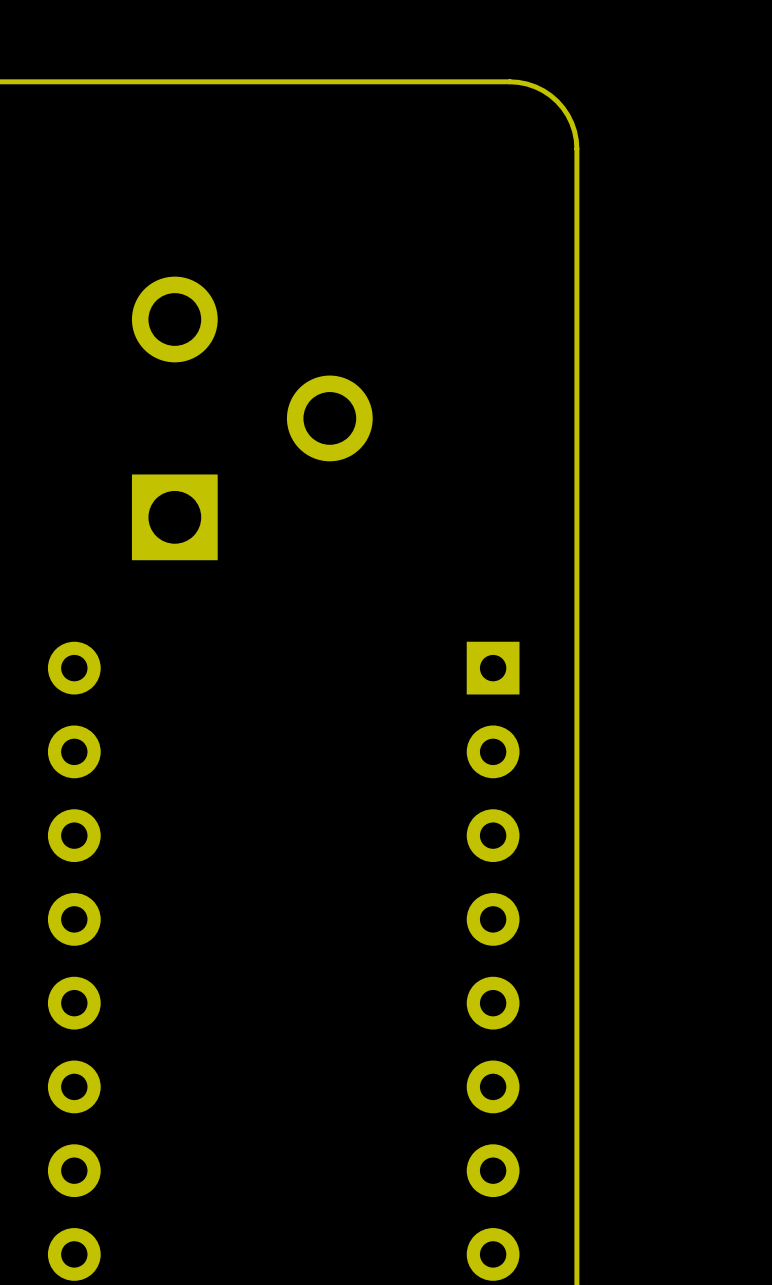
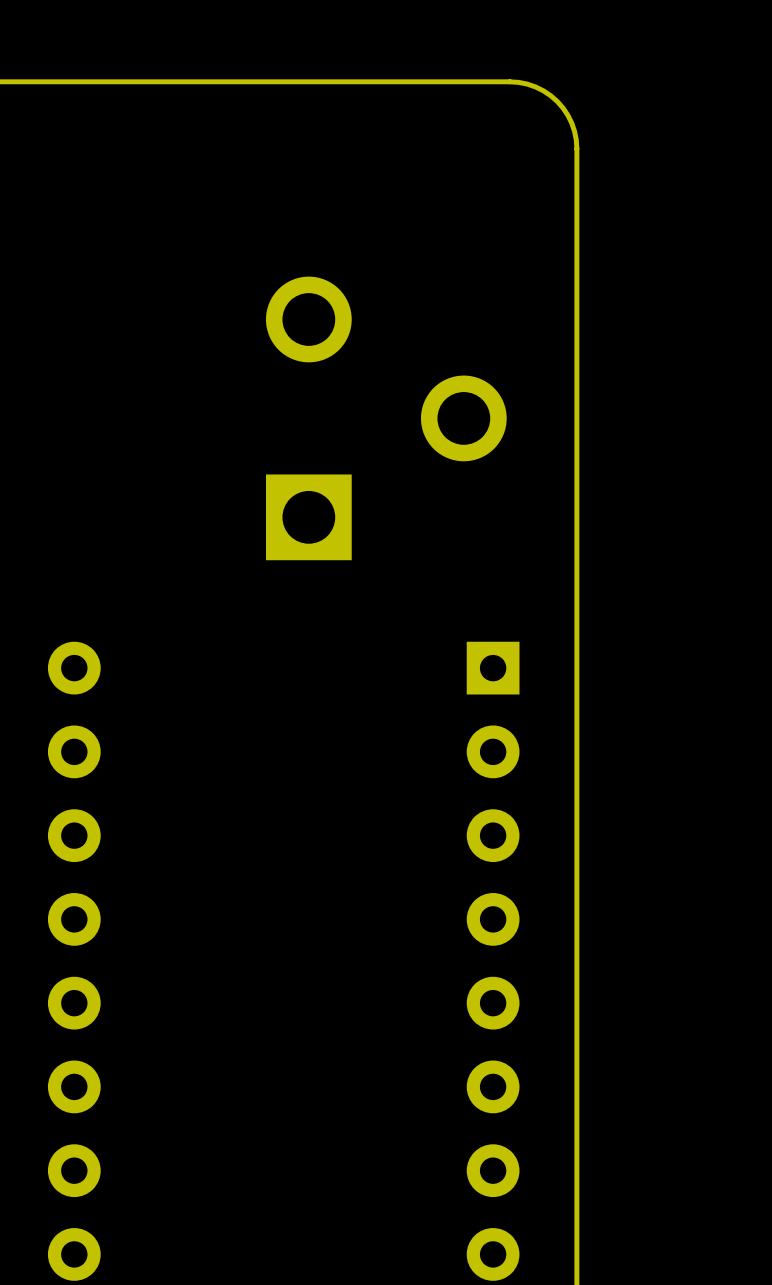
part position: (252, 418) -> (386, 418)

